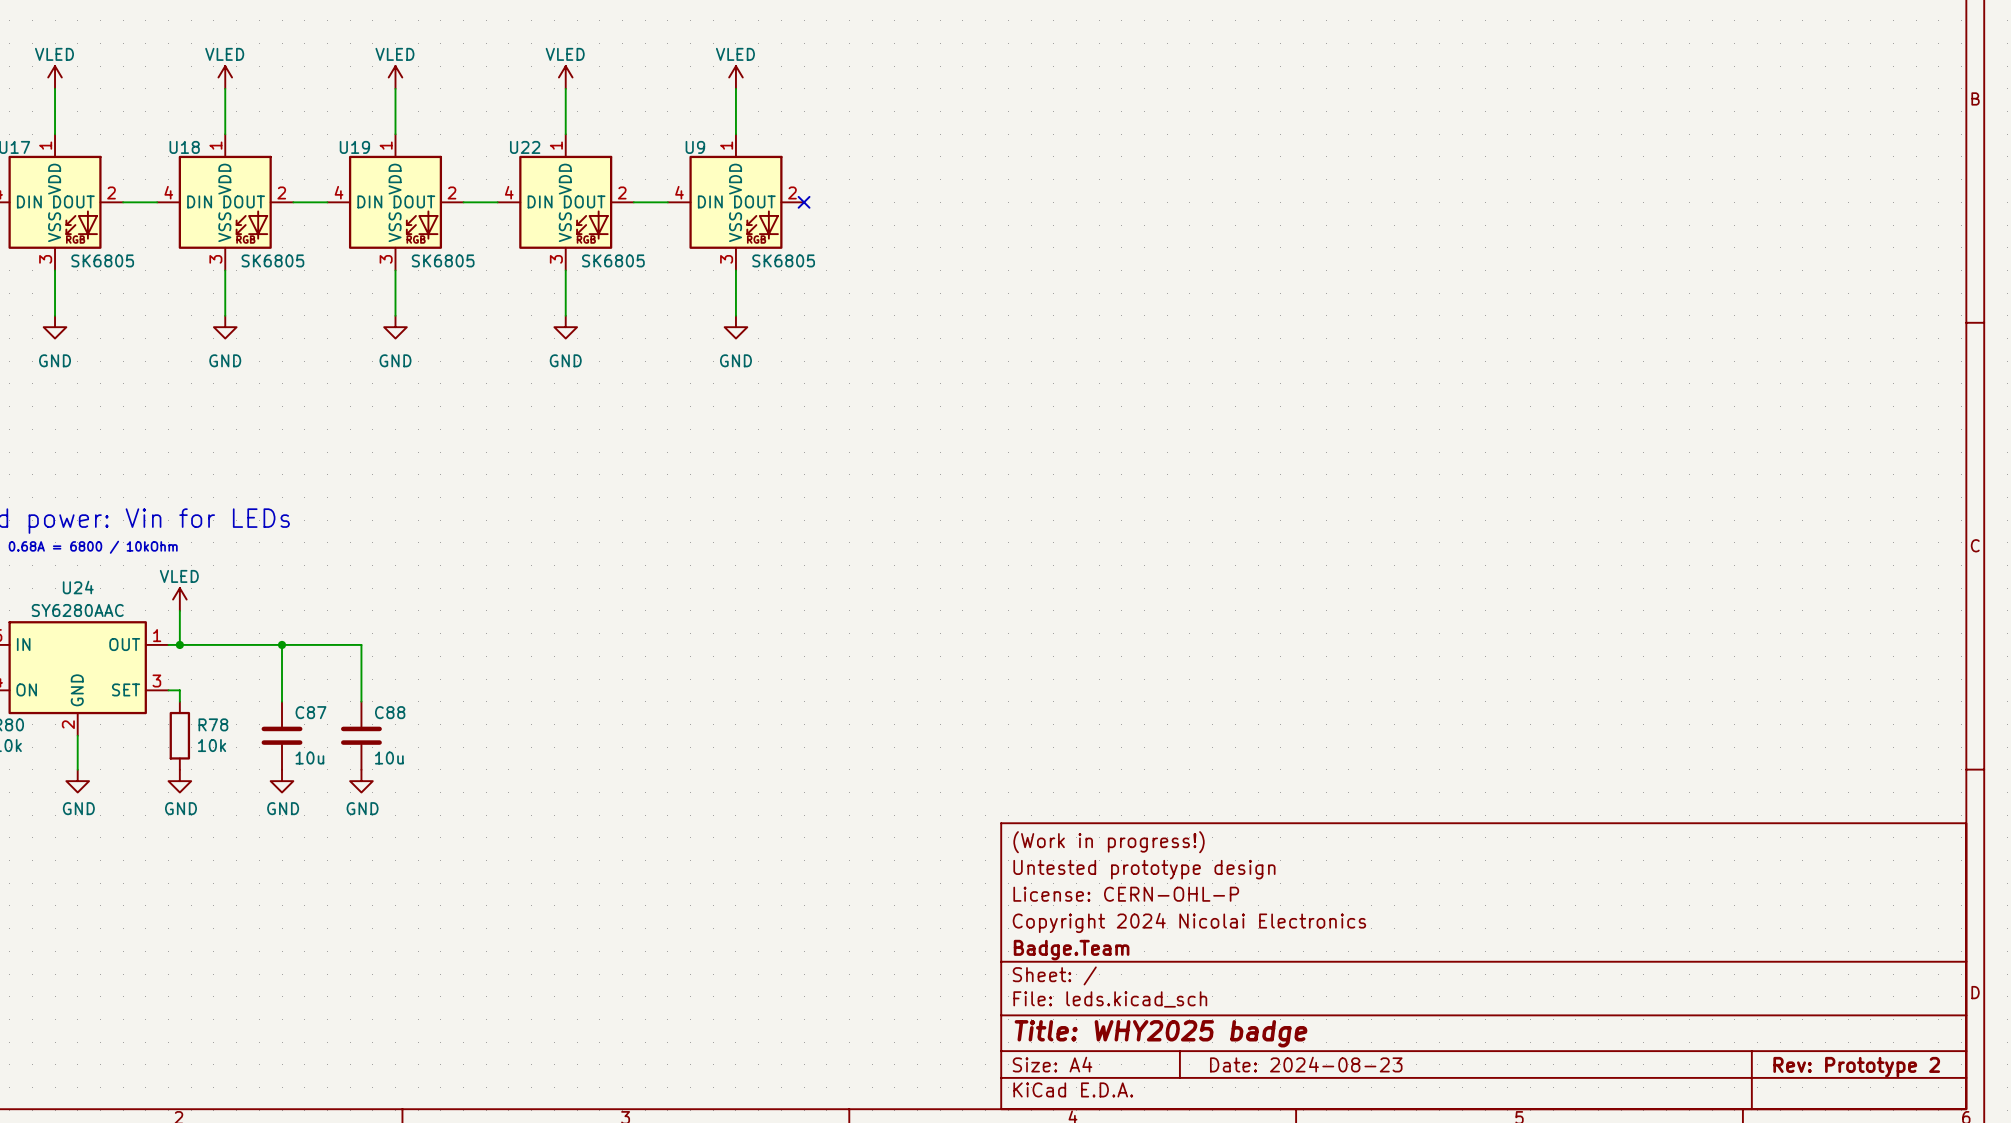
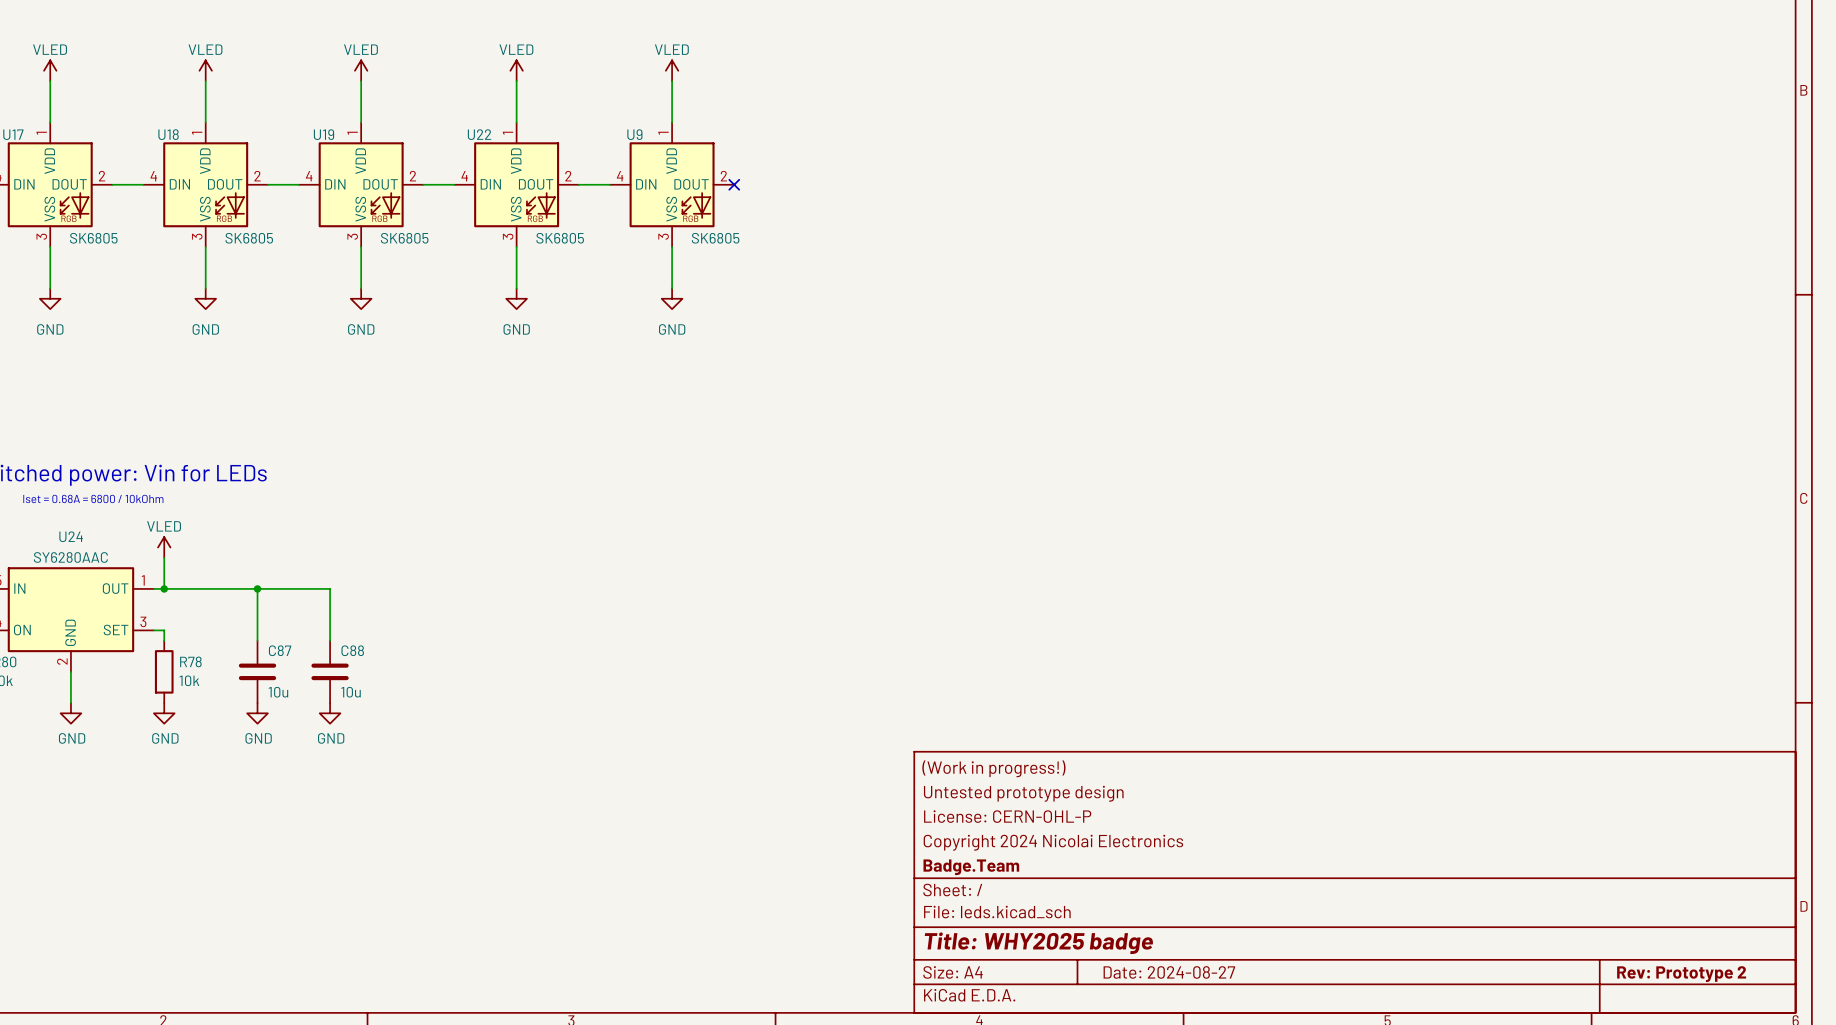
title block: Date: 2024-08-23 (1306, 1064) -> Date: 2024-08-27 (1169, 972)

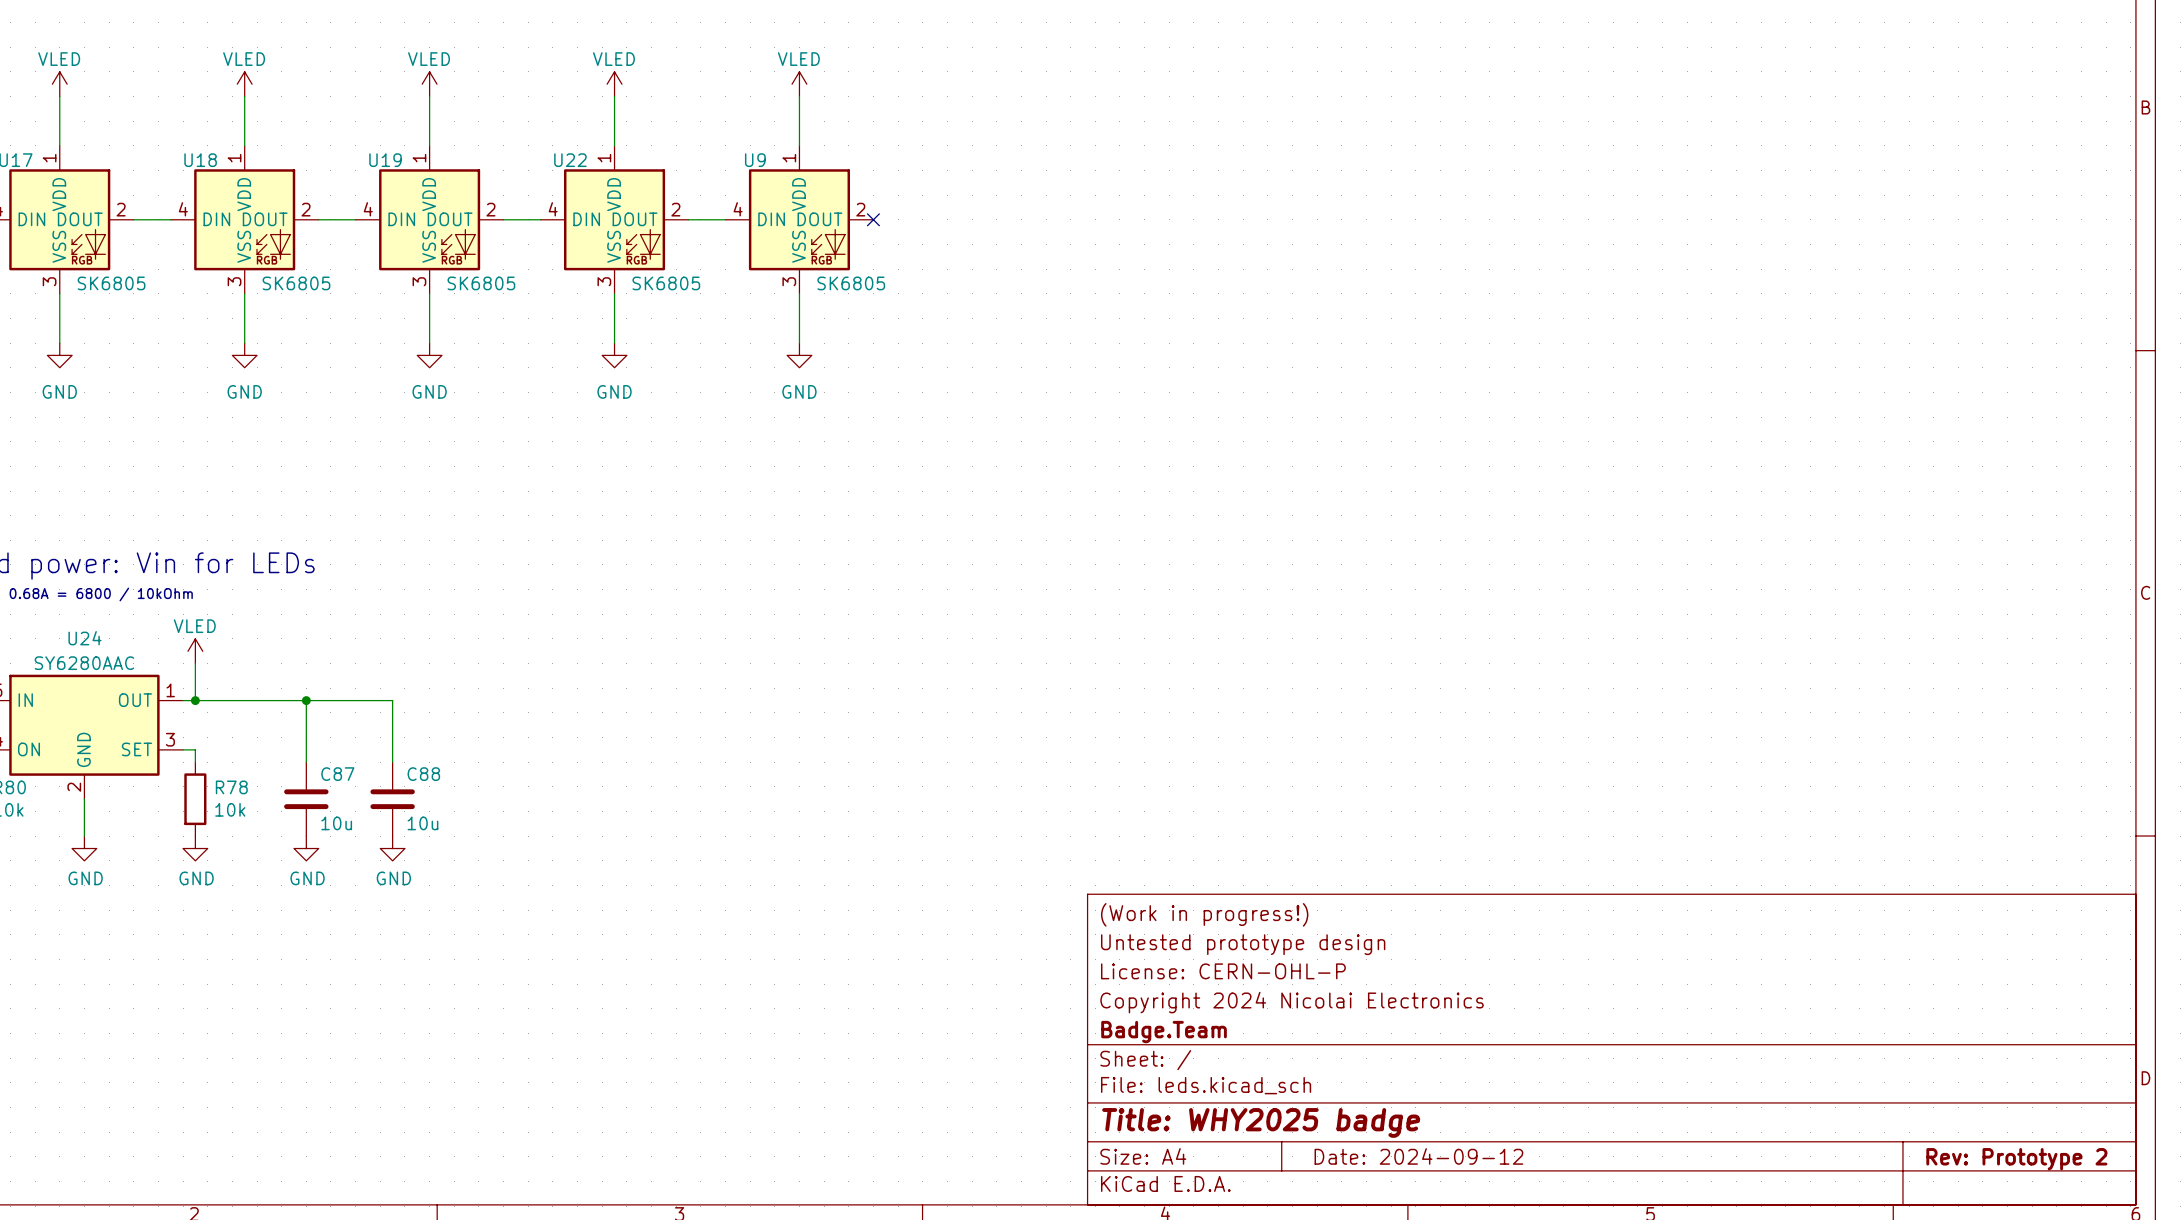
title block: Date: 2024-08-27 (1169, 972) -> Date: 2024-09-12 (1418, 1156)

